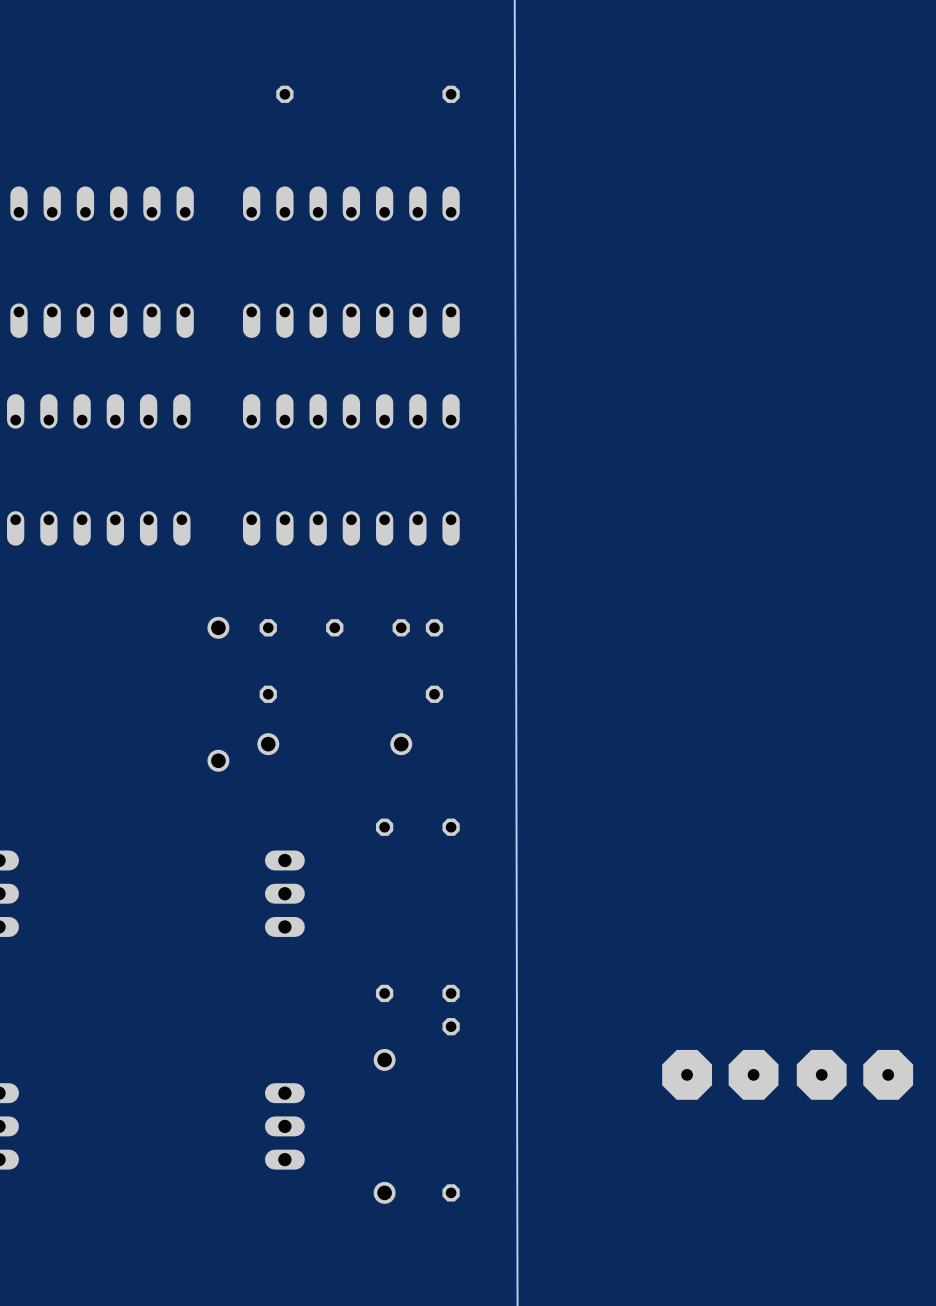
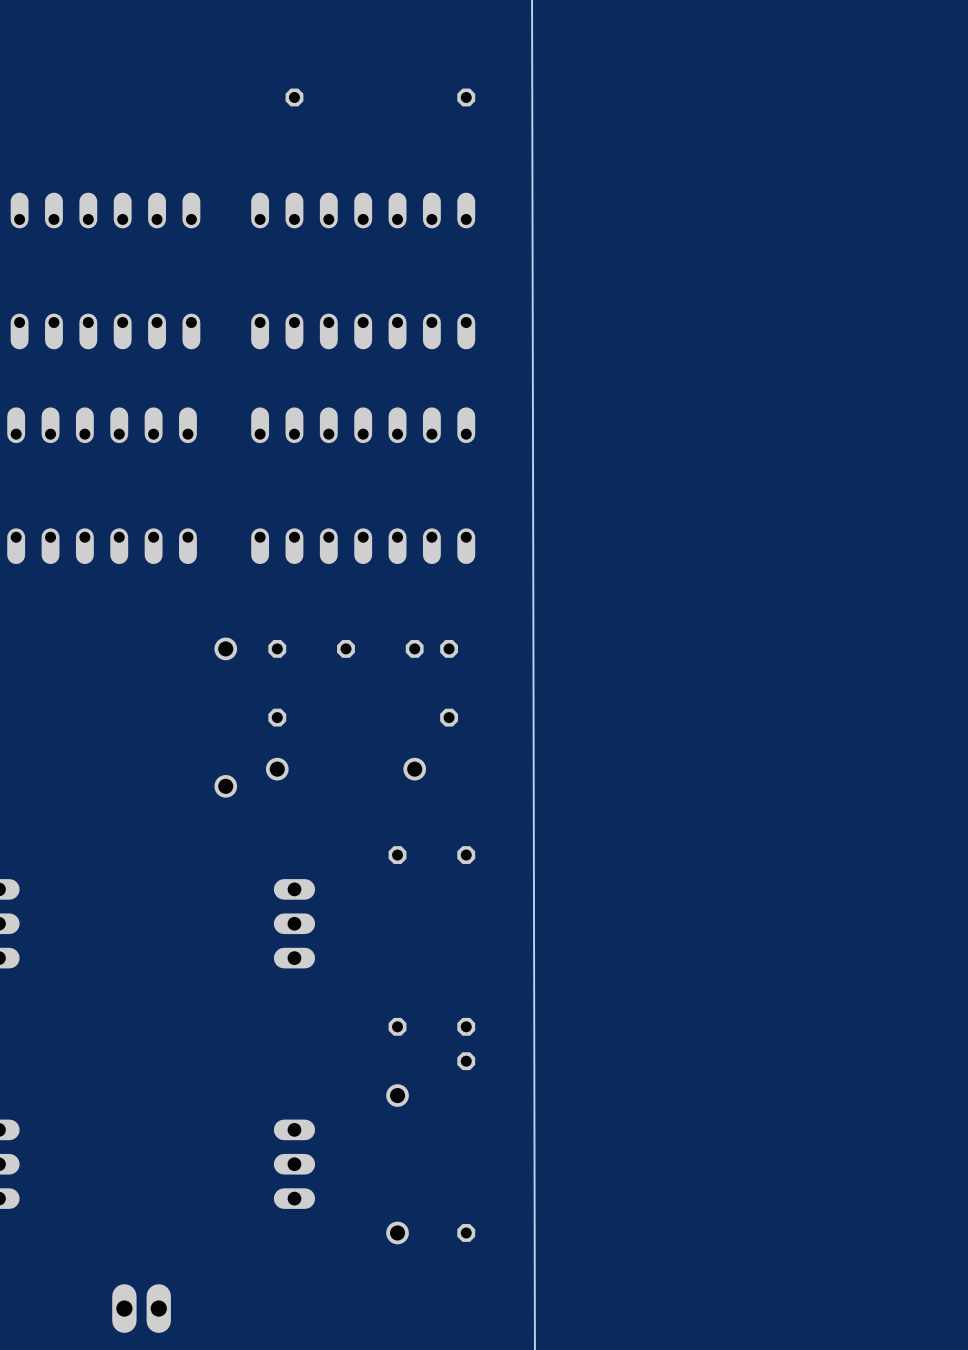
part: (720, 1074) -> none
part: (854, 1074) -> none
part: none -> (141, 1308)

